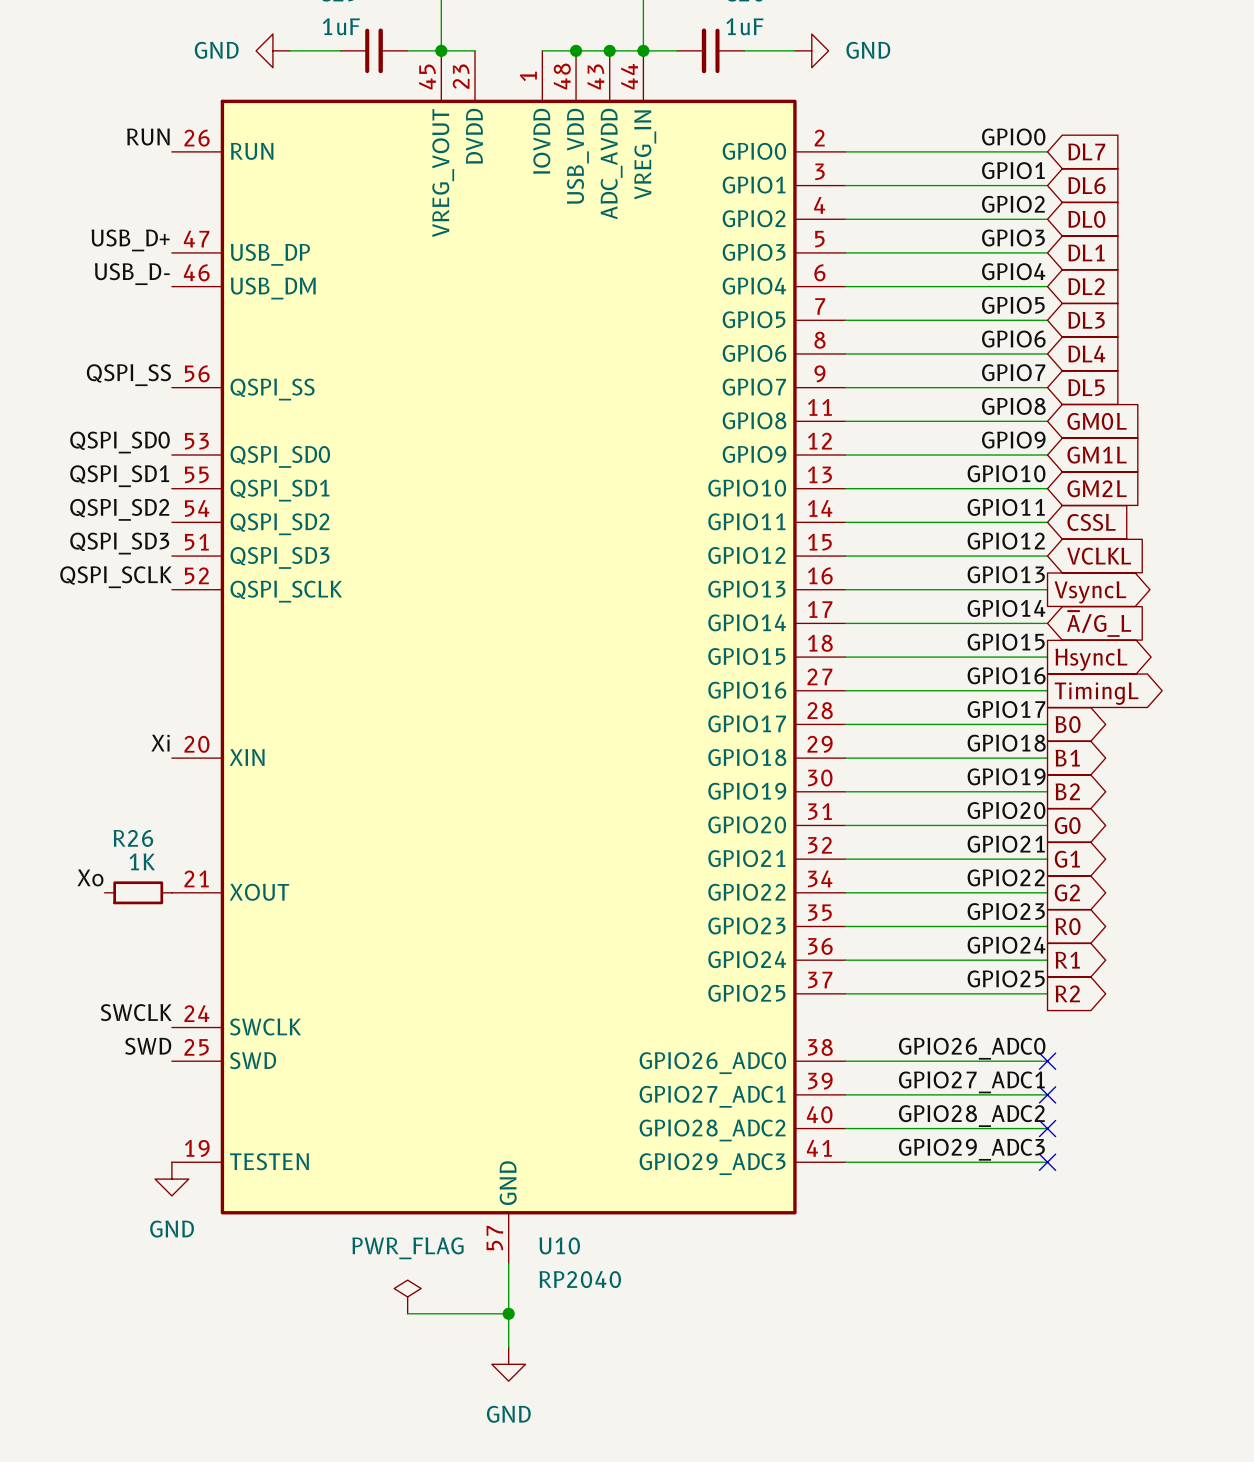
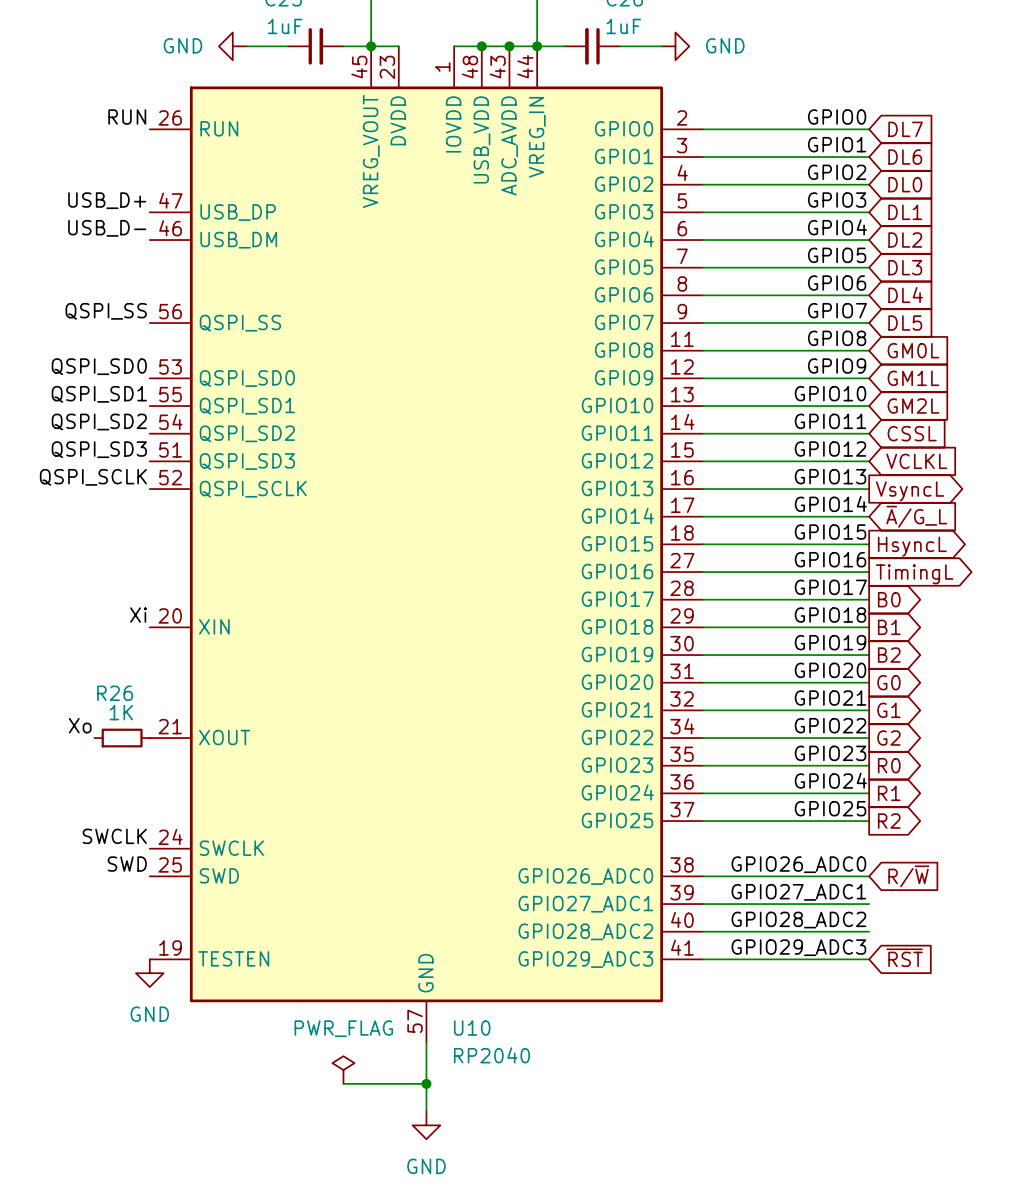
global label: none -> R/~{W} (908, 876)
no-connect mark: (1047, 1061) -> none
no-connect mark: (1047, 1094) -> none
no-connect mark: (1047, 1128) -> none
global label: none -> ~{RST} (904, 957)
no-connect mark: (1047, 1162) -> none

